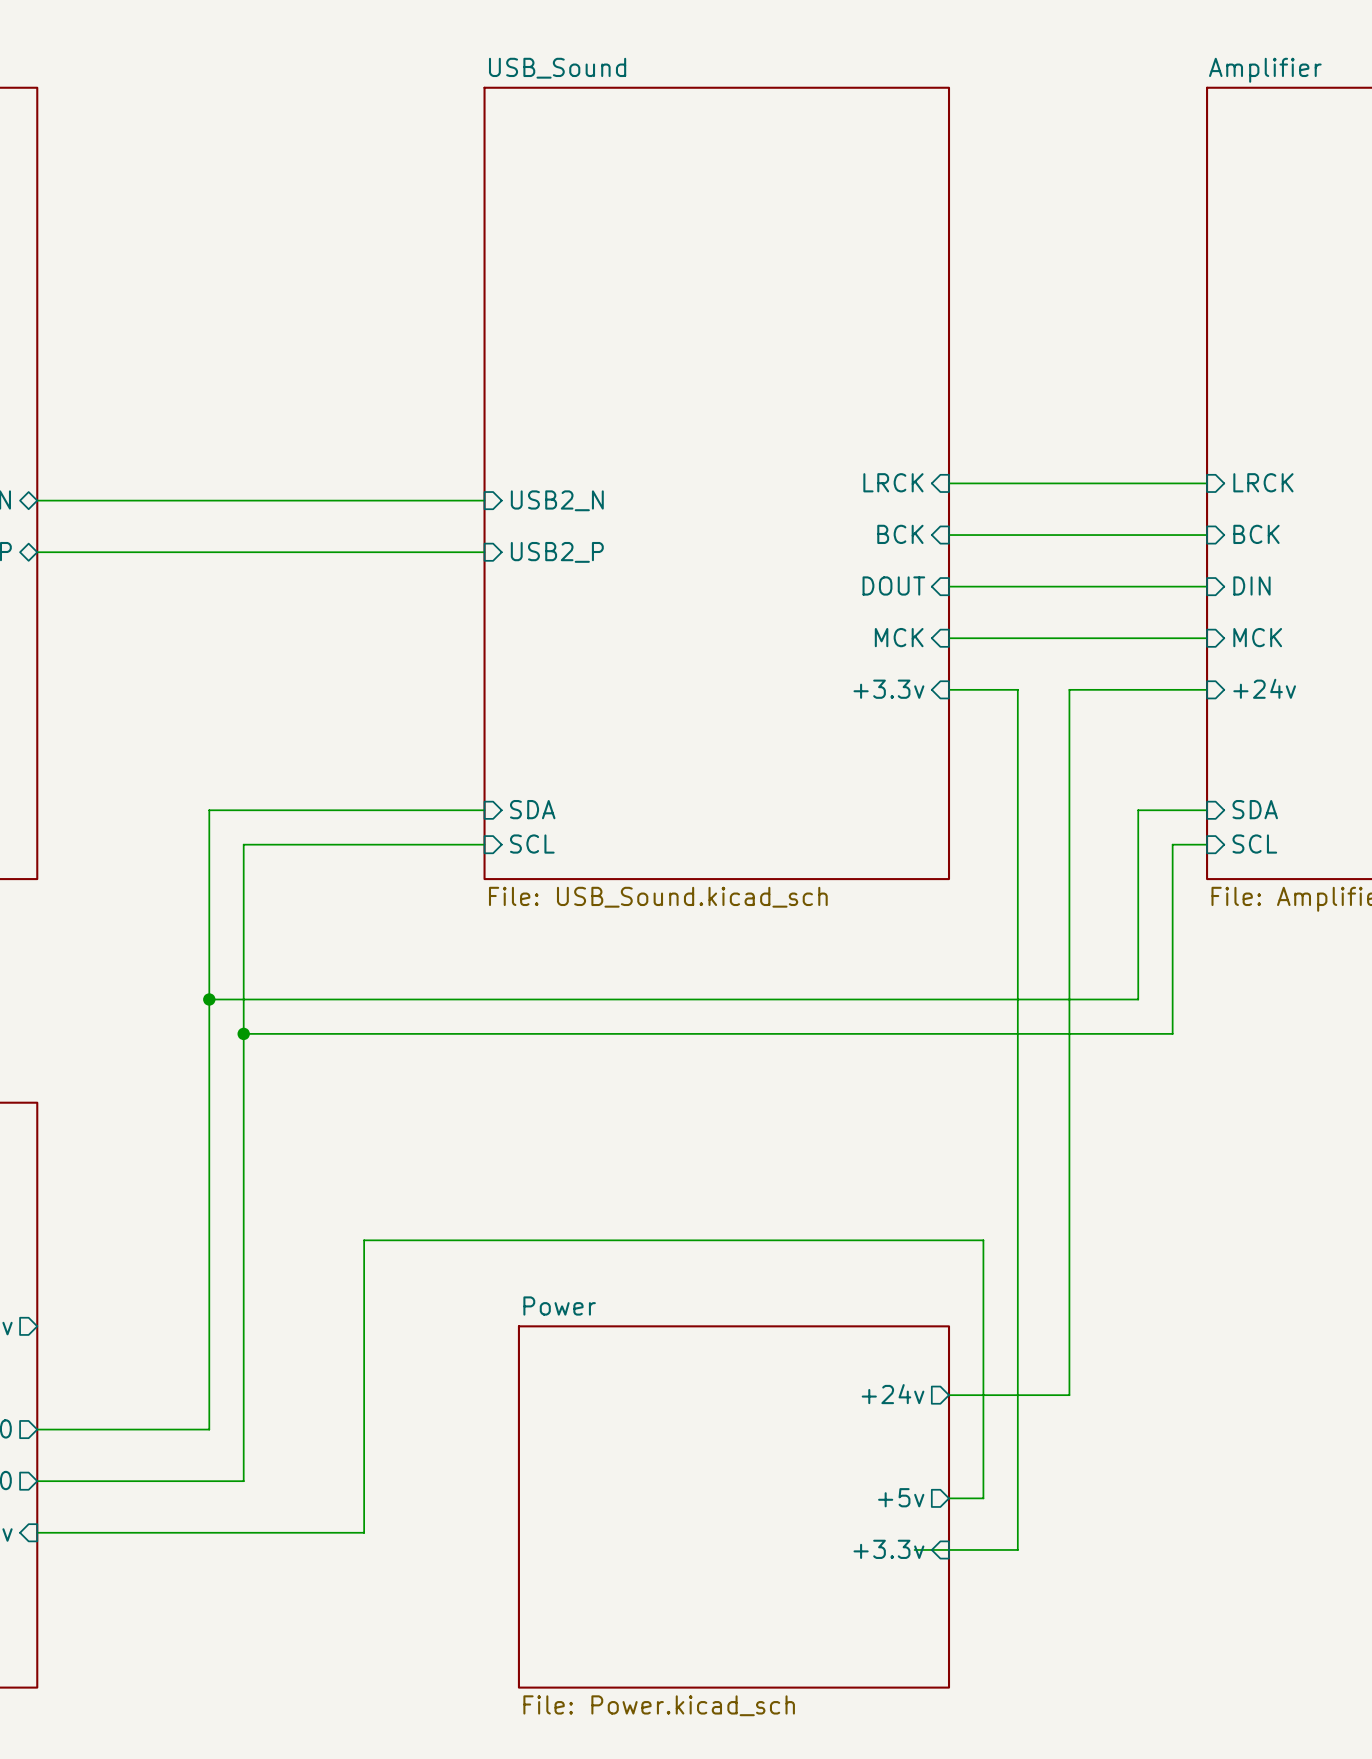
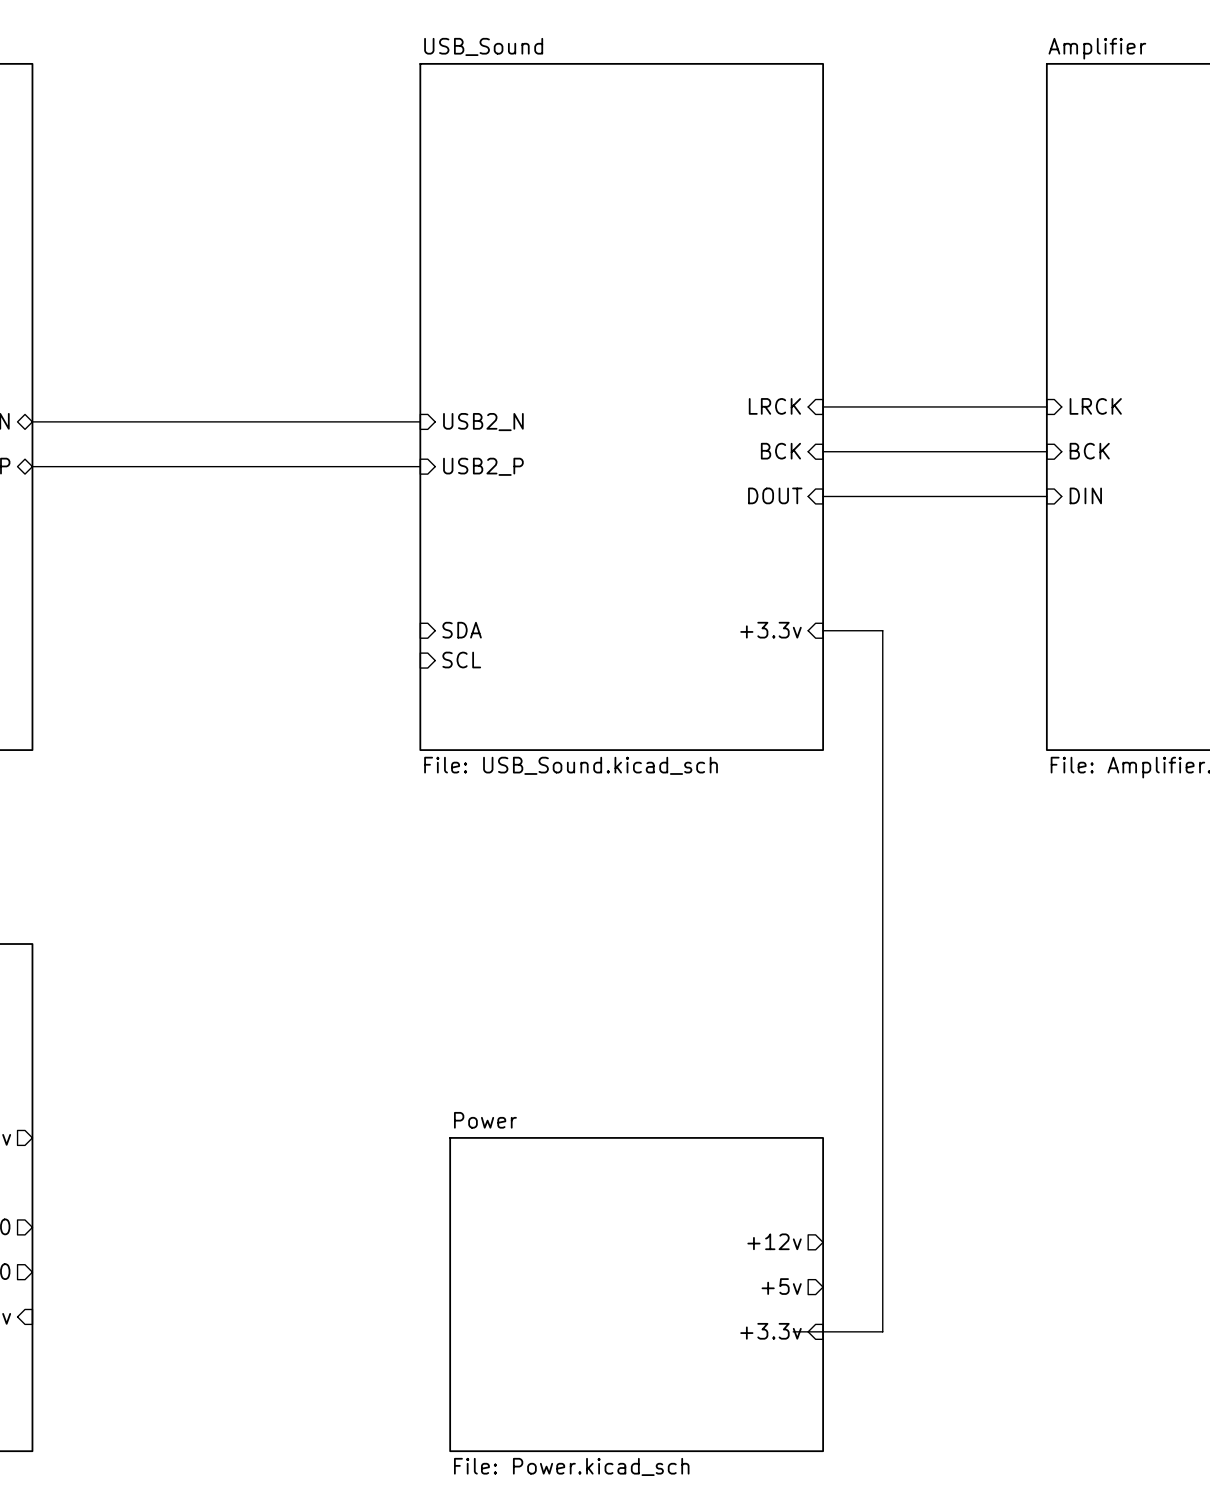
sheet pin: MCK (899, 637) -> none
sheet pin: MCK (1257, 637) -> none
wire: (949, 638) (1207, 638) -> none
sheet pin: +24v (1264, 688) -> none
sheet pin position: +3.3v (888, 689) -> +3.3v (771, 630)
wire: (949, 689) (1017, 689) (1017, 741) -> (823, 630) (882, 630)
wire: (1207, 689) (1069, 689) (1069, 1395) (949, 1395) -> none
sheet pin position: SDA (532, 809) -> SDA (462, 630)
sheet pin: SDA (1255, 809) -> none
wire: (484, 810) (209, 810) (209, 1429) (37, 1429) -> none
wire: (1207, 810) (1138, 810) (1138, 999) (209, 999) -> none
wire: (484, 844) (243, 844) (243, 1481) (37, 1481) -> none
sheet pin position: SCL (532, 844) -> SCL (461, 660)
wire: (1207, 844) (1172, 844) (1172, 1033) (243, 1033) -> none
sheet pin: SCL (1254, 844) -> none
junction: (209, 999) -> none
junction: (243, 1033) -> none
sheet pin: +24v (893, 1394) -> none
sheet pin: none -> +12v (774, 1241)
wire: (949, 1498) (983, 1498) (983, 1240) (364, 1240) (364, 1532) (37, 1532) -> none

